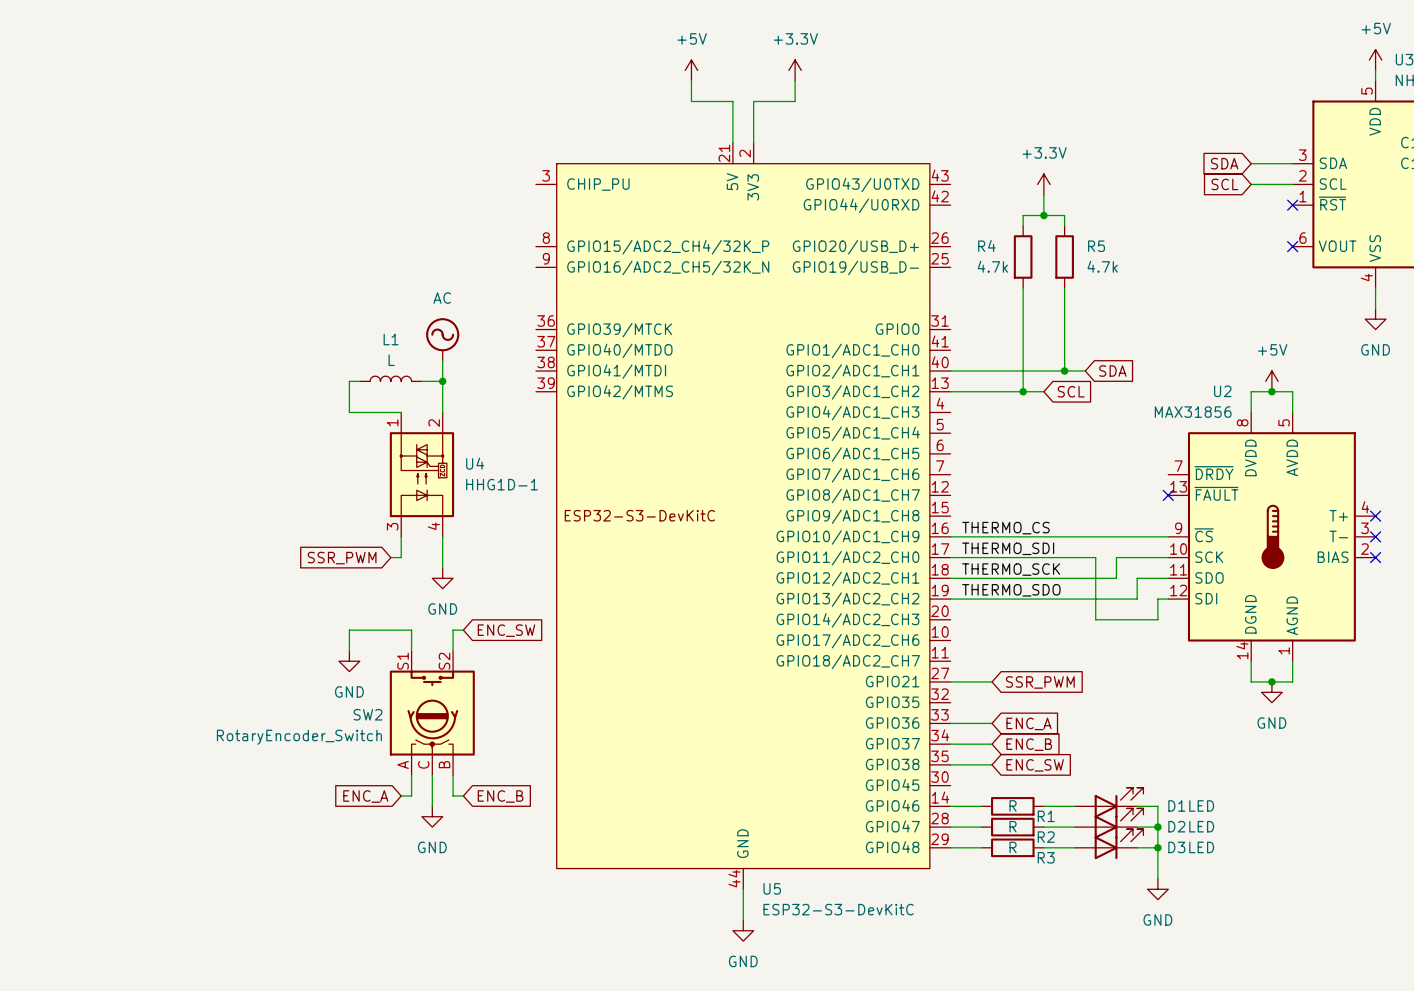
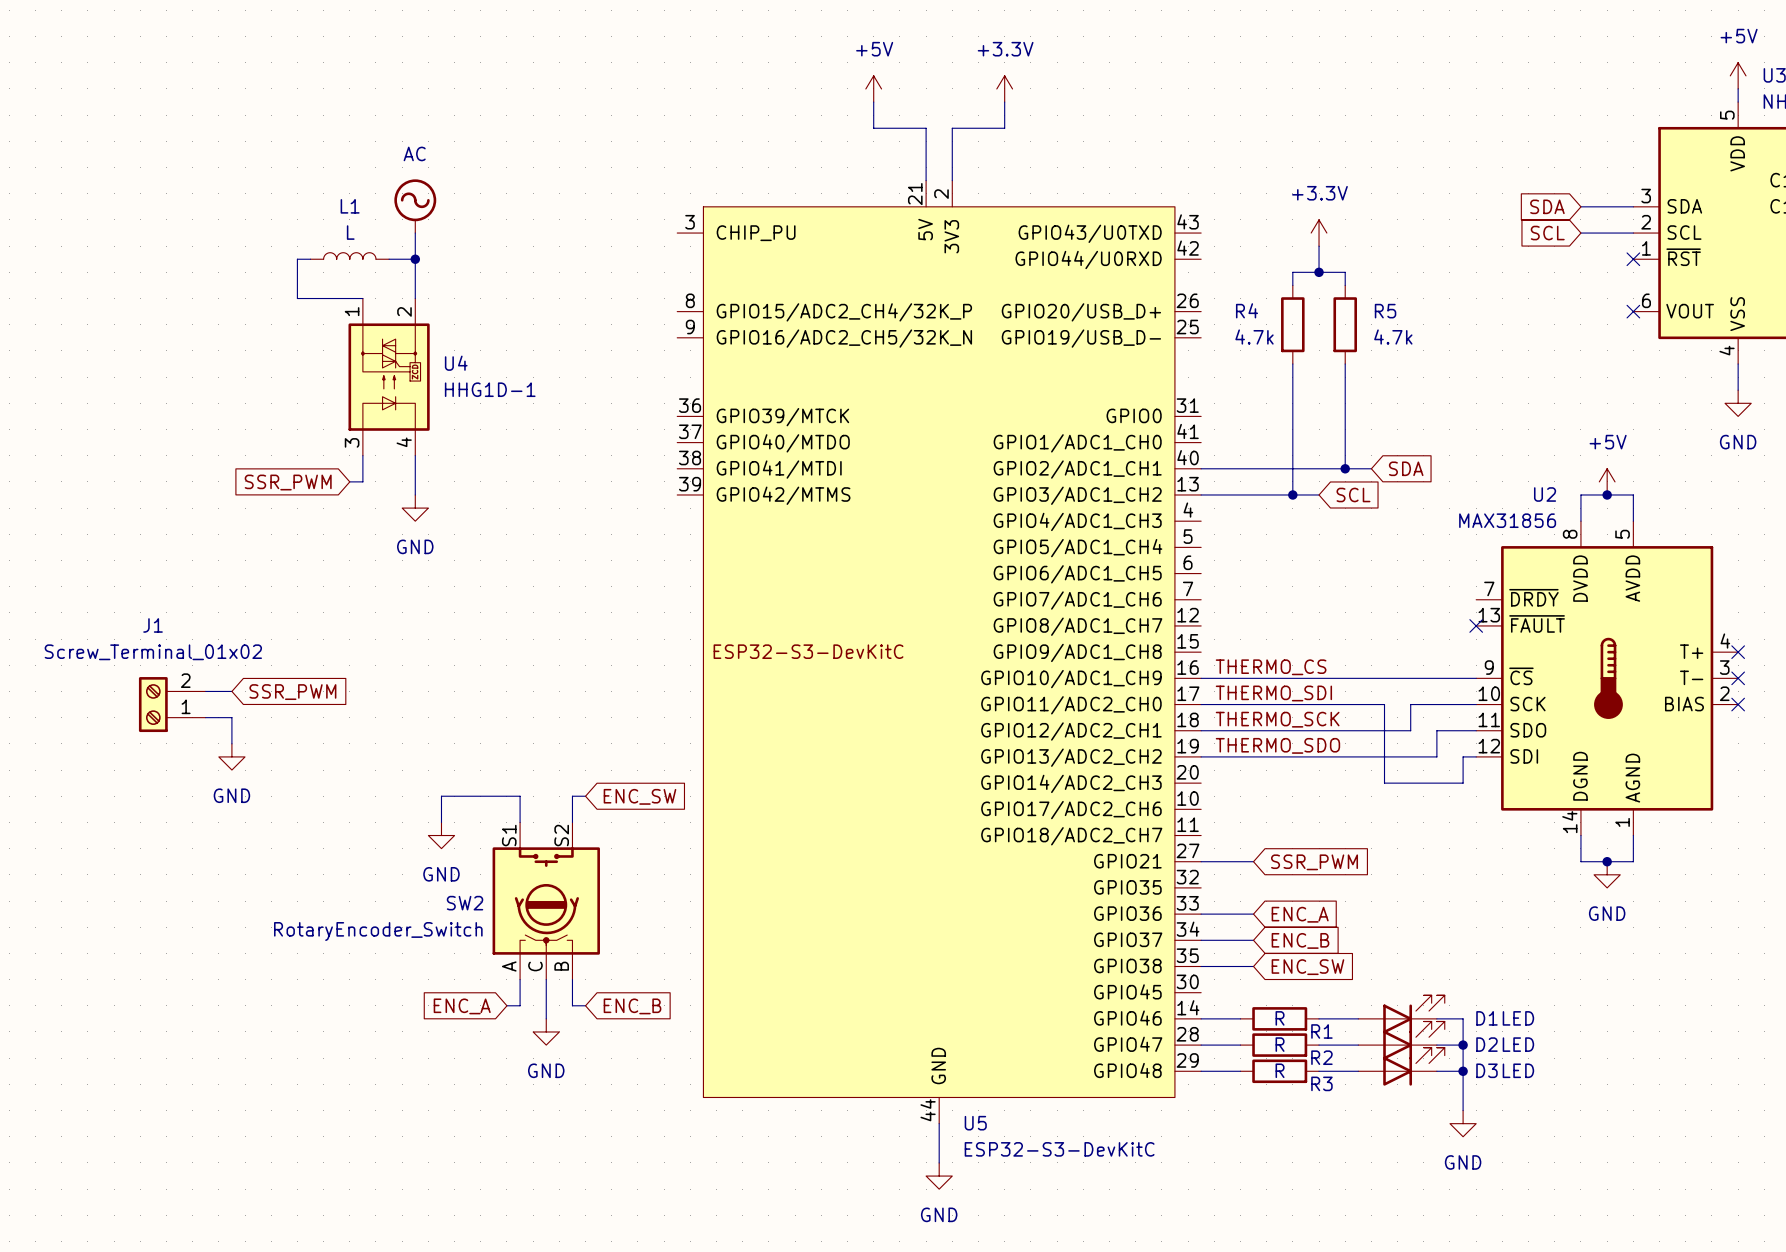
power symbol: none -> AC (415, 206)
wire: none -> (415, 233) (415, 298)
wire: none -> (310, 259) (297, 259) (297, 298) (362, 298)
wire: none -> (389, 259) (415, 259)
junction: none -> (415, 259)
power symbol: AC (442, 339) -> none
wire: none -> (362, 455) (362, 481) (349, 481)
wire: none -> (415, 455) (415, 494)
wire: (442, 360) (442, 412) -> none
L1 position: (390, 378) -> (349, 255)
global label: none -> SSR_PWM (288, 482)
wire: (359, 381) (349, 381) (349, 412) (401, 412) -> none
wire: (421, 381) (442, 381) -> none
junction: (442, 381) -> none
power symbol: none -> GND (415, 508)
U4 position: (421, 474) -> (389, 377)
wire: (401, 536) (401, 557) (390, 557) -> none
wire: (442, 536) (442, 567) -> none
wire: none -> (205, 691) (231, 691)
global label: none -> SSR_PWM (292, 692)
J1: none -> Screw_Terminal_01x02 (172, 704)
global label: SSR_PWM (342, 558) -> none
wire: none -> (205, 717) (231, 717) (231, 743)
power symbol: GND (442, 578) -> none
power symbol: none -> GND (231, 756)

